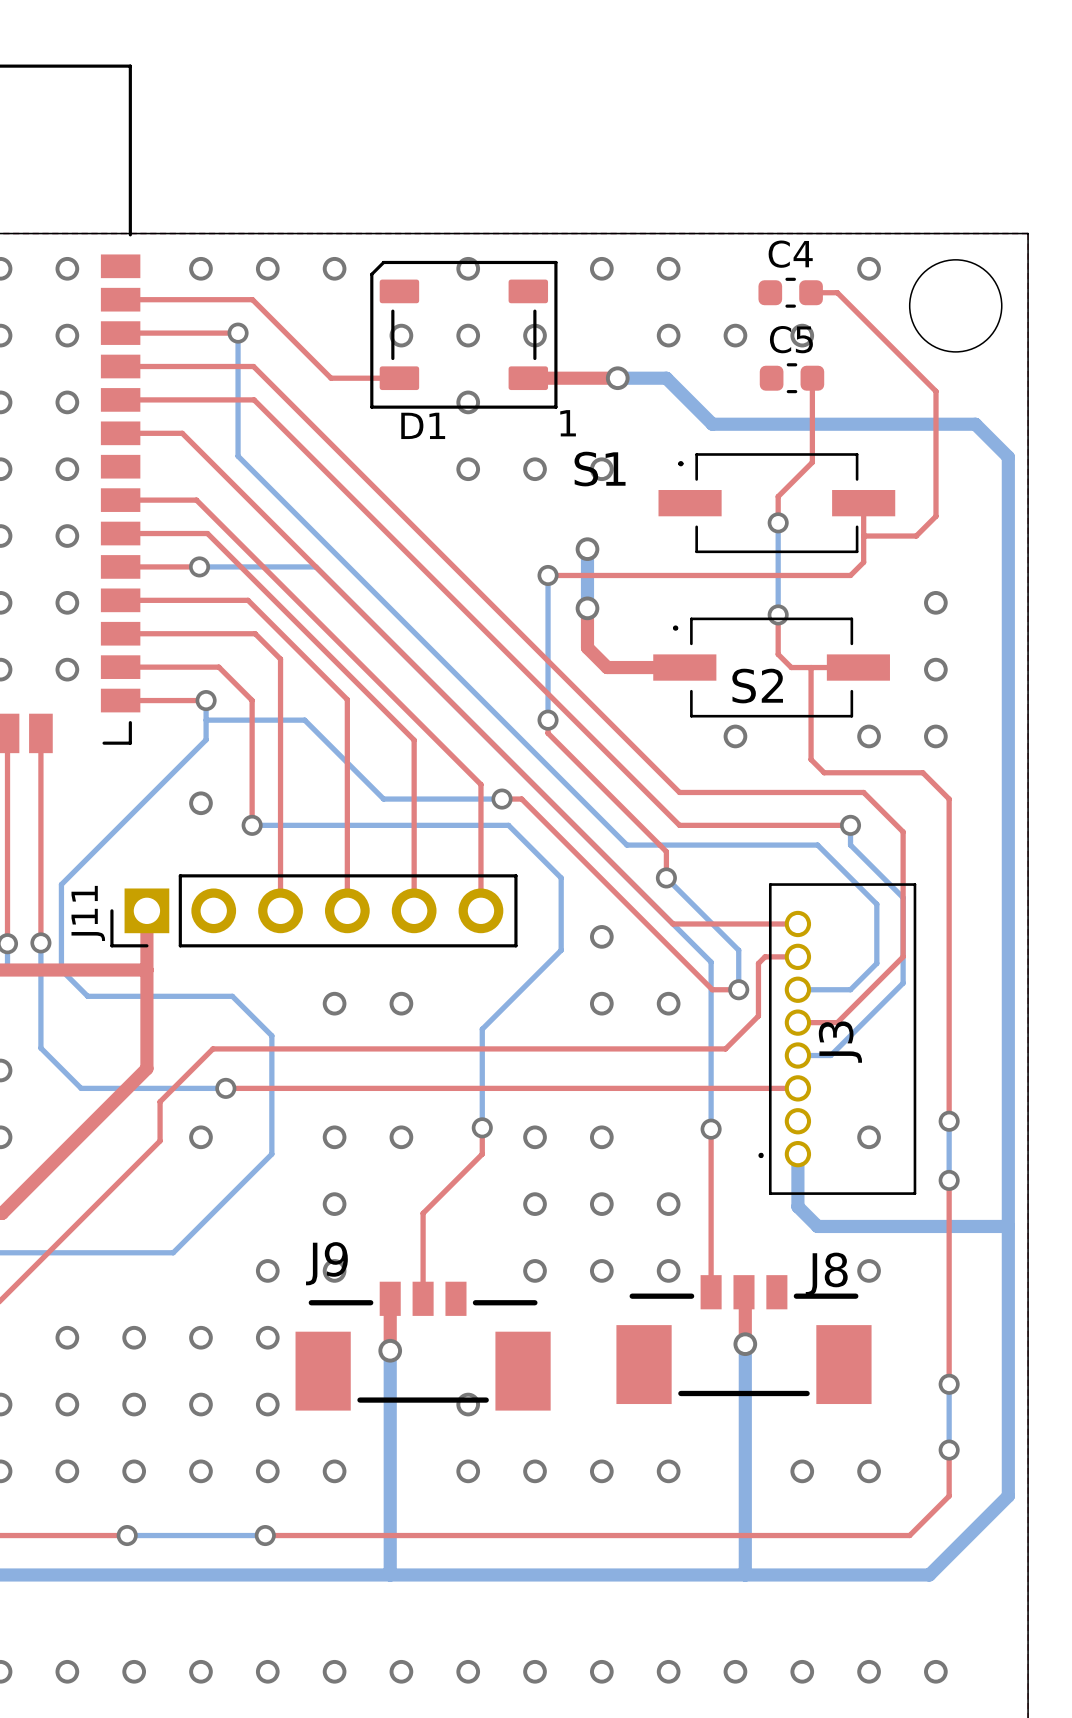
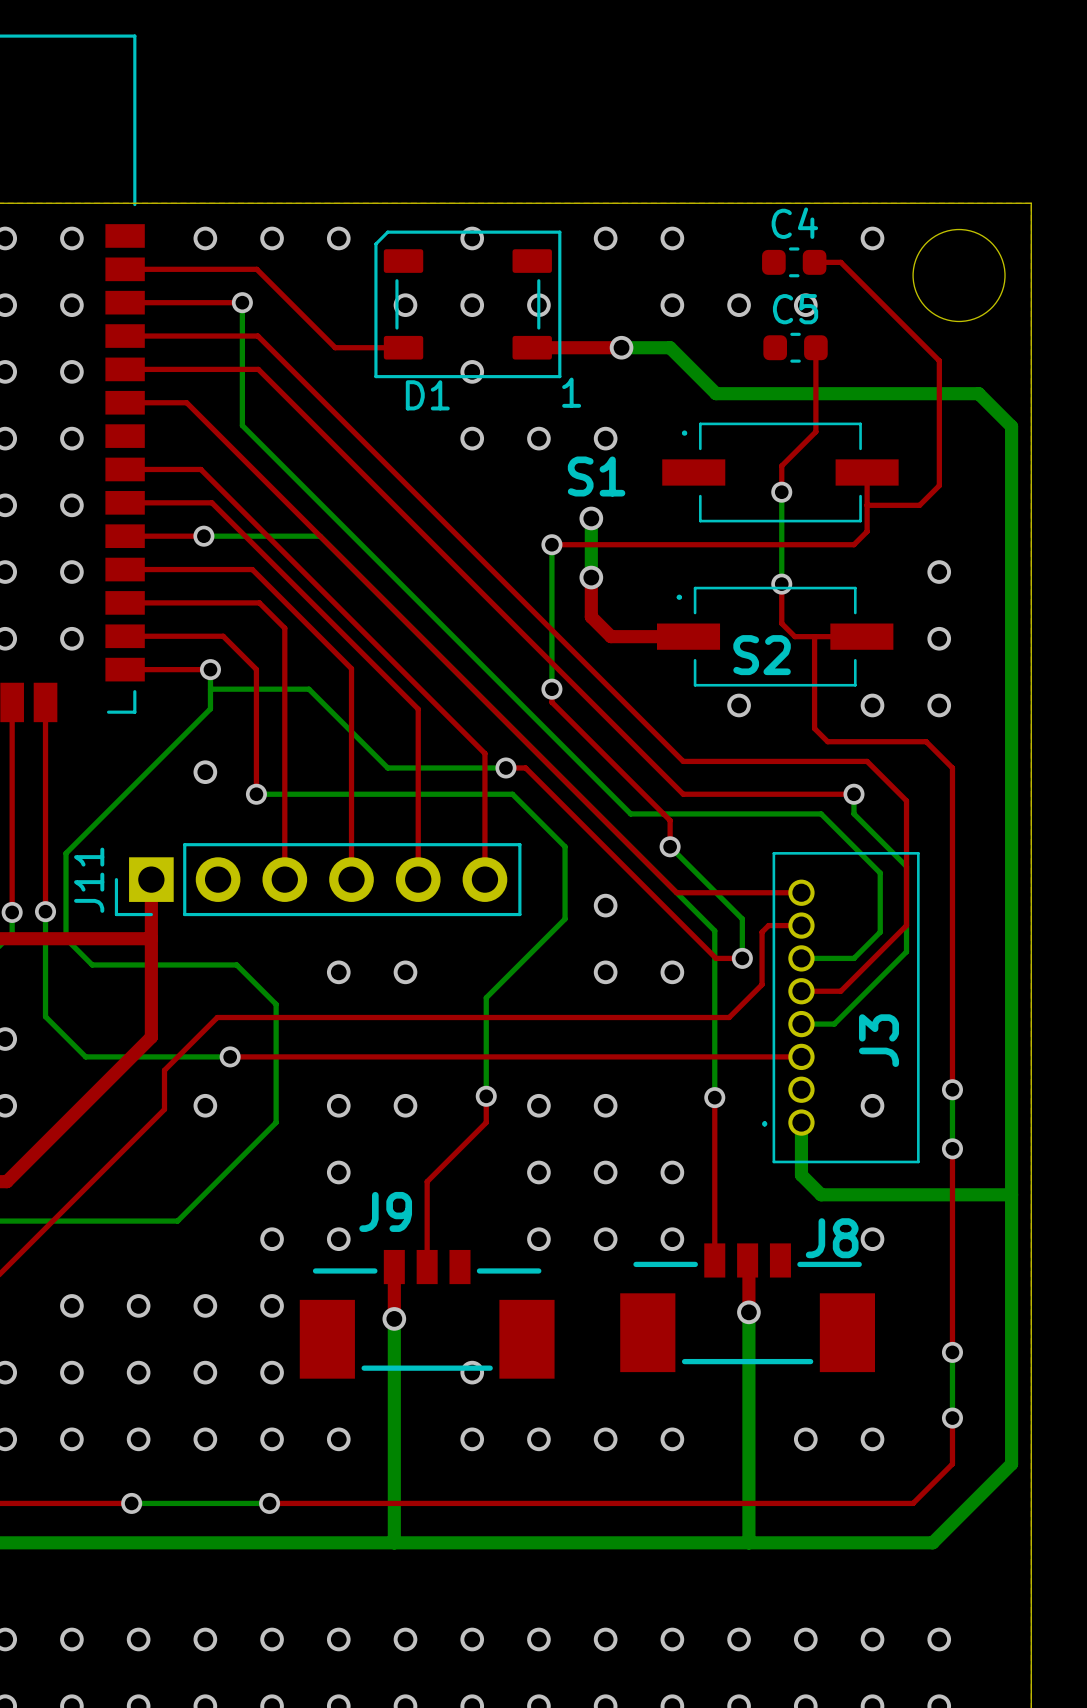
S1 name position: S1 (600, 469) -> S1 (596, 476)
J3 name position: J3 (840, 1042) -> J3 (879, 1040)
J9 name position: J9 (326, 1263) -> J9 (385, 1211)

